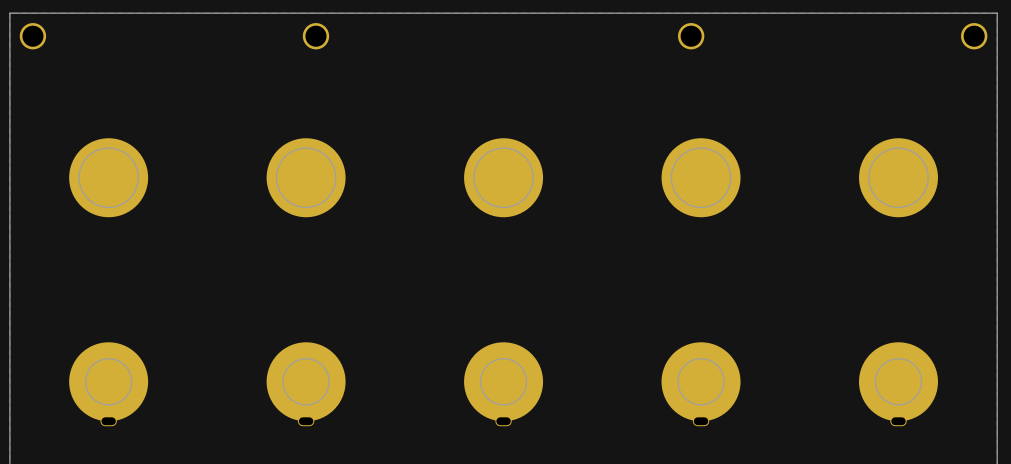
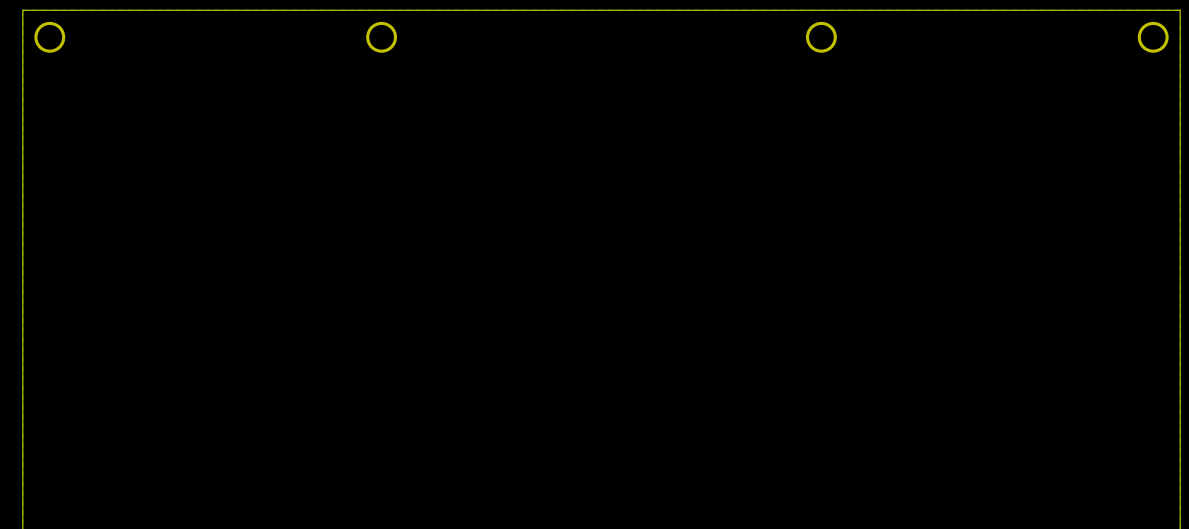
part: (108, 177) -> none
part: (306, 177) -> none
part: (503, 177) -> none
part: (701, 177) -> none
part: (898, 177) -> none
part: (108, 384) -> none
part: (306, 384) -> none
part: (503, 384) -> none
part: (701, 384) -> none
part: (898, 384) -> none

